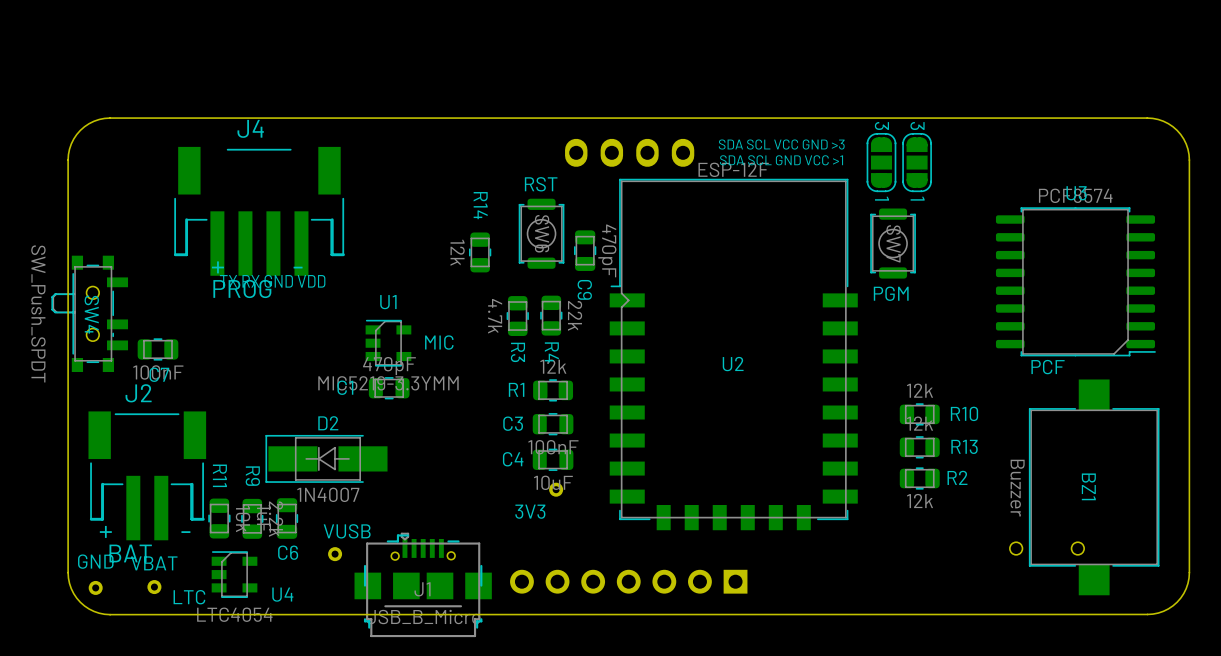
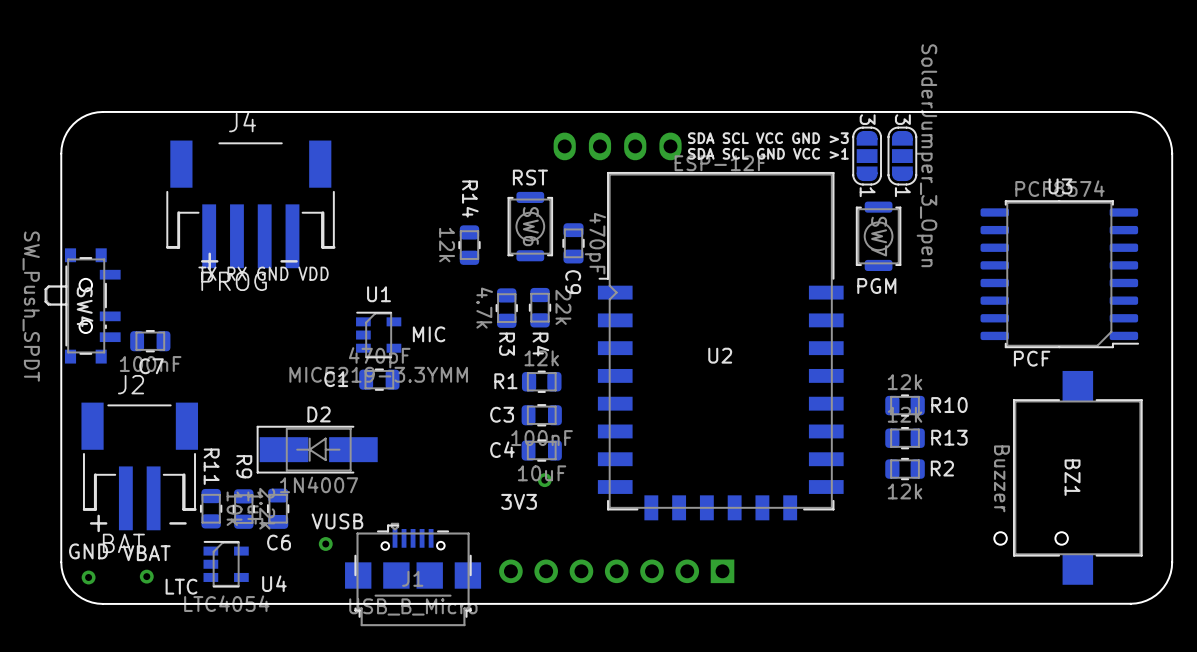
part value: none -> SolderJumper_3_Open (926, 155)

